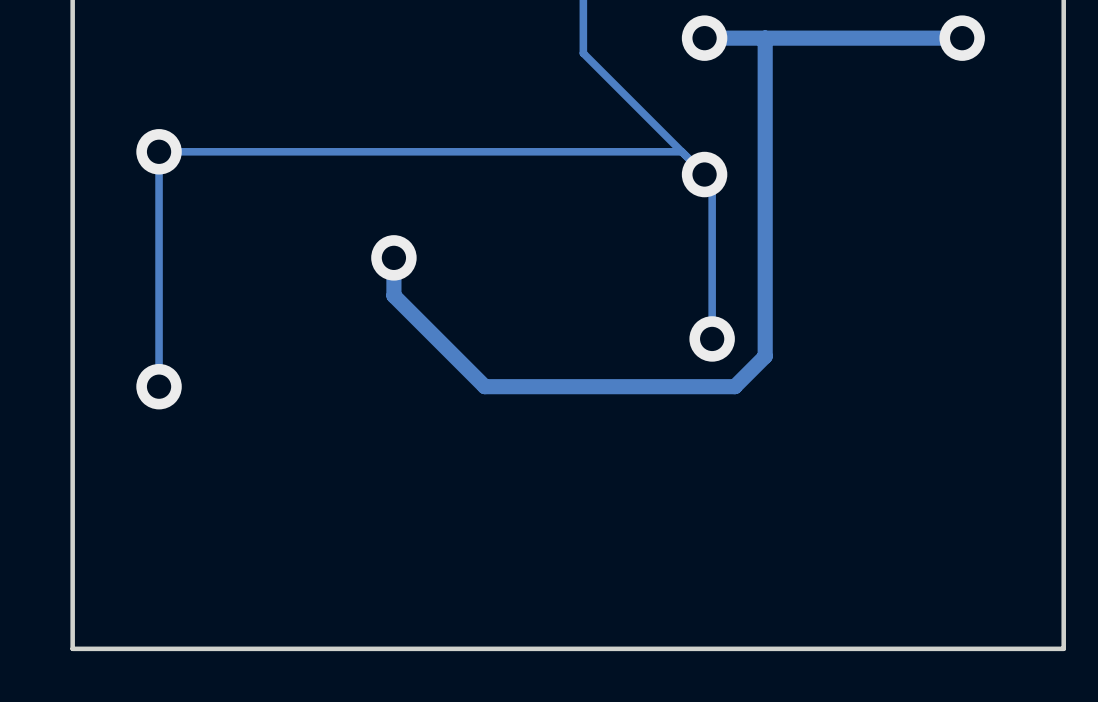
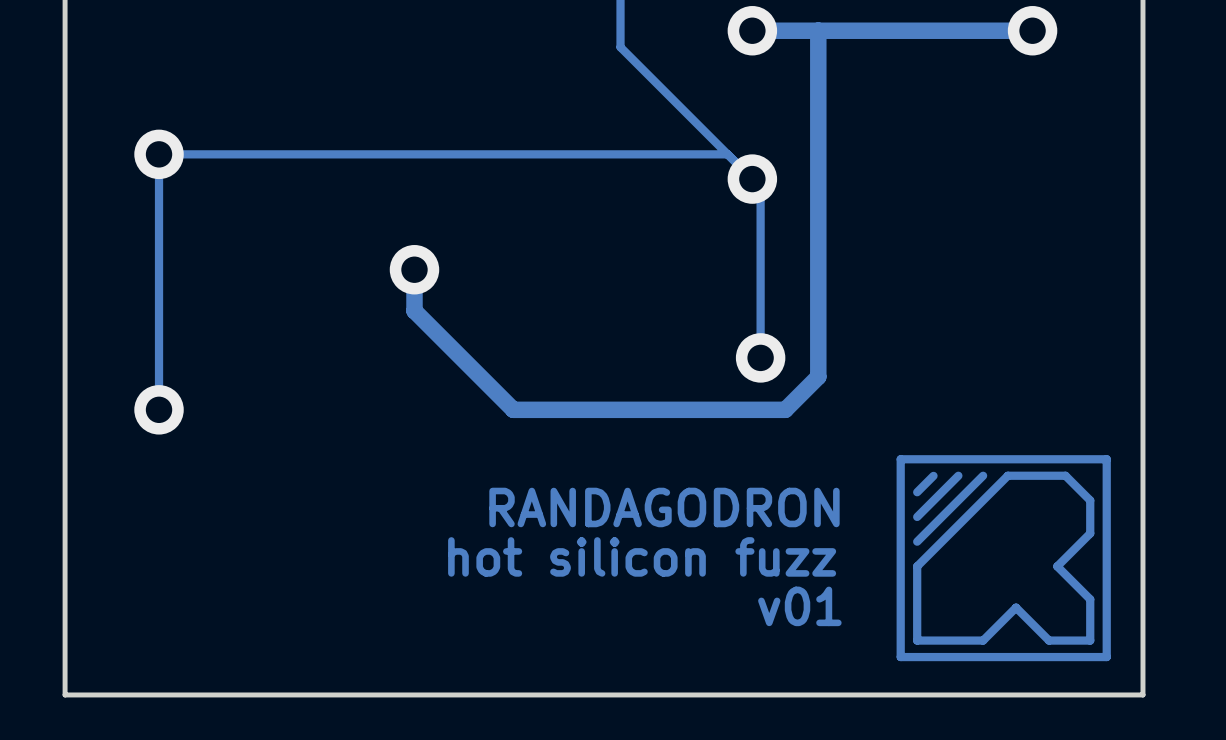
track: none -> (1106, 459) (1106, 657) (900, 657) (900, 459) (1106, 459)
track: none -> (933, 475) (917, 492)
track: none -> (958, 475) (917, 516)
track: none -> (983, 475) (917, 541)
track: none -> (1065, 475) (1007, 475) (917, 566) (917, 640) (983, 640) (1016, 607) (1049, 640) (1090, 640) (1090, 599) (1057, 566) (1090, 533) (1090, 500) (1065, 475)
text: none -> RANDAGODRON (664, 507)
text: none -> hot silicon fuzz (642, 556)
text: none -> v01 (799, 606)

